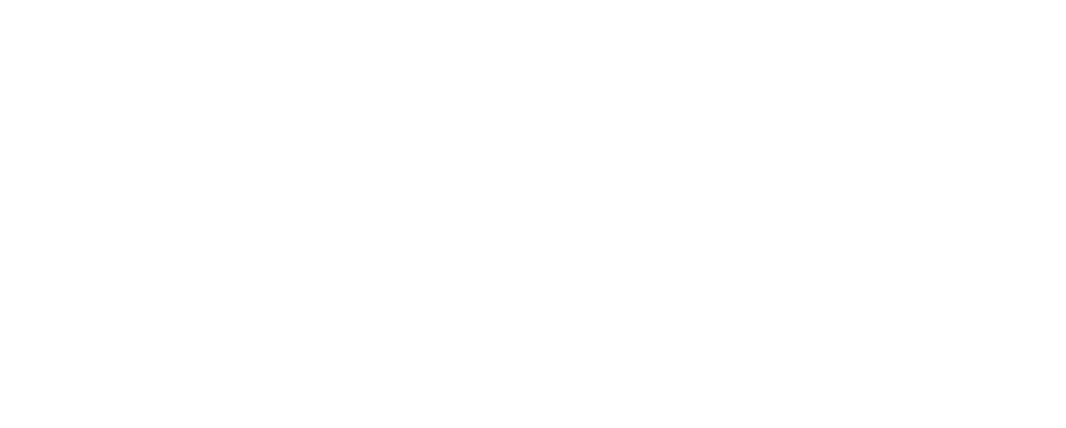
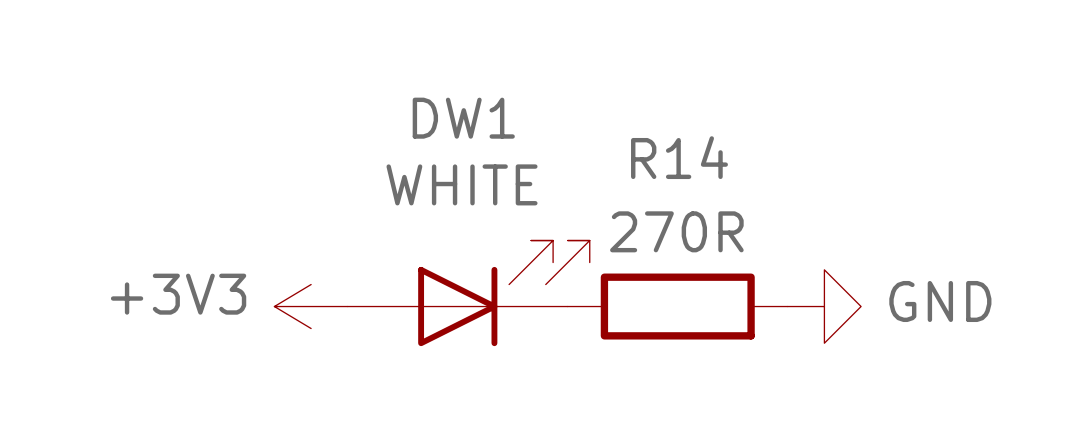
DW1: none -> WHITE (468, 293)
power symbol: none -> +3V3 (311, 306)
R14: none -> 270R (677, 306)
power symbol: none -> GND (824, 306)

